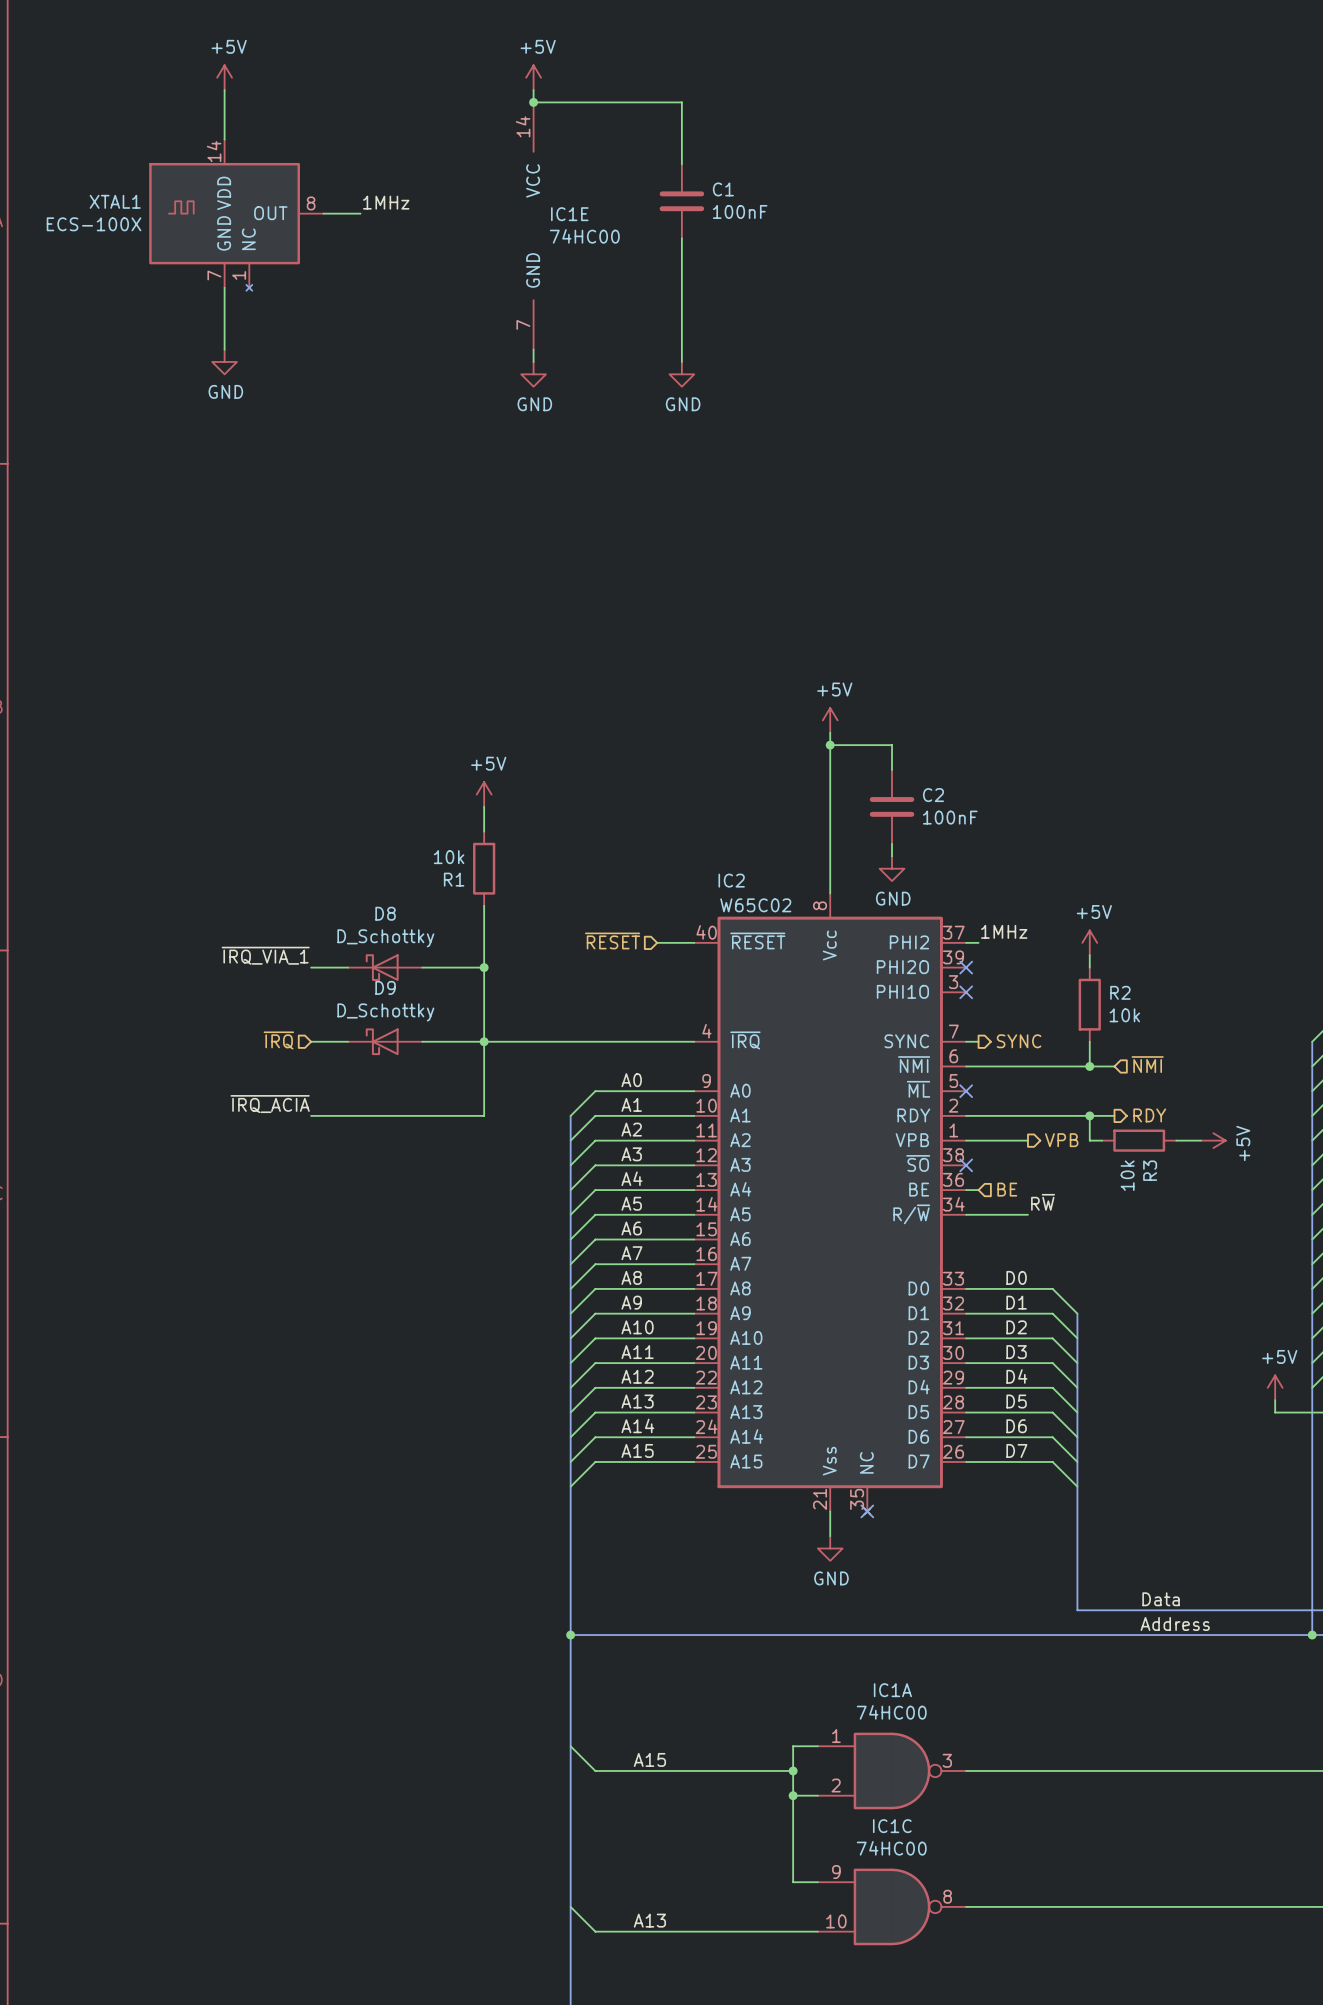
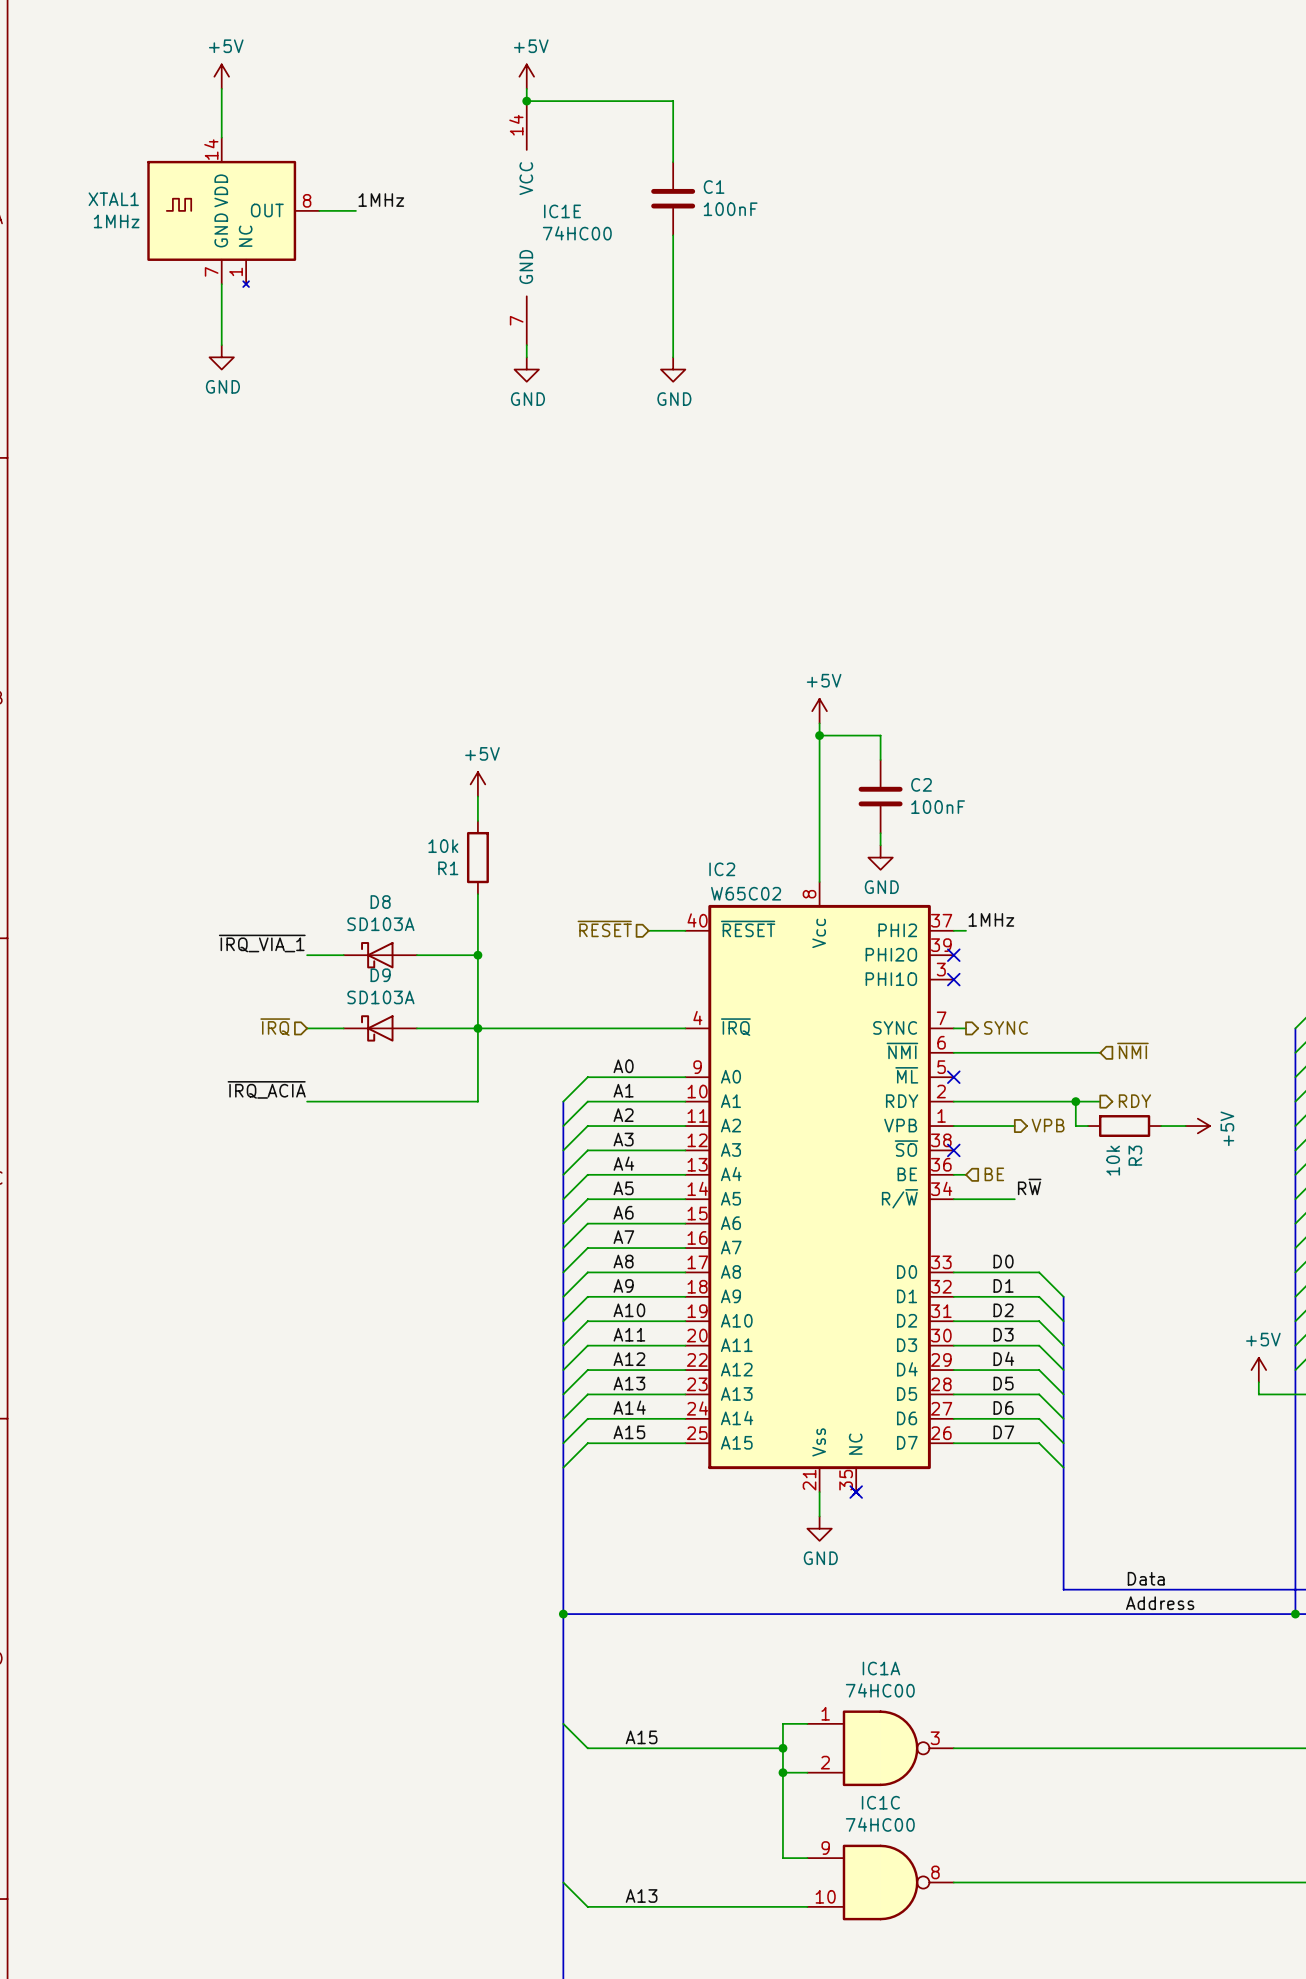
XTAL1 value: ECS-100X (94, 224) -> 1MHz (116, 221)
D8 value: D_Schottky (385, 938) -> SD103A (380, 924)
power symbol: +5V (1089, 942) -> none
wire: (1089, 955) (1089, 967) -> none
R2: 10k (1089, 1004) -> none
D9 value: D_Schottky (385, 1012) -> SD103A (380, 997)
wire: (1089, 1041) (1089, 1066) -> none
junction: (1089, 1066) -> none

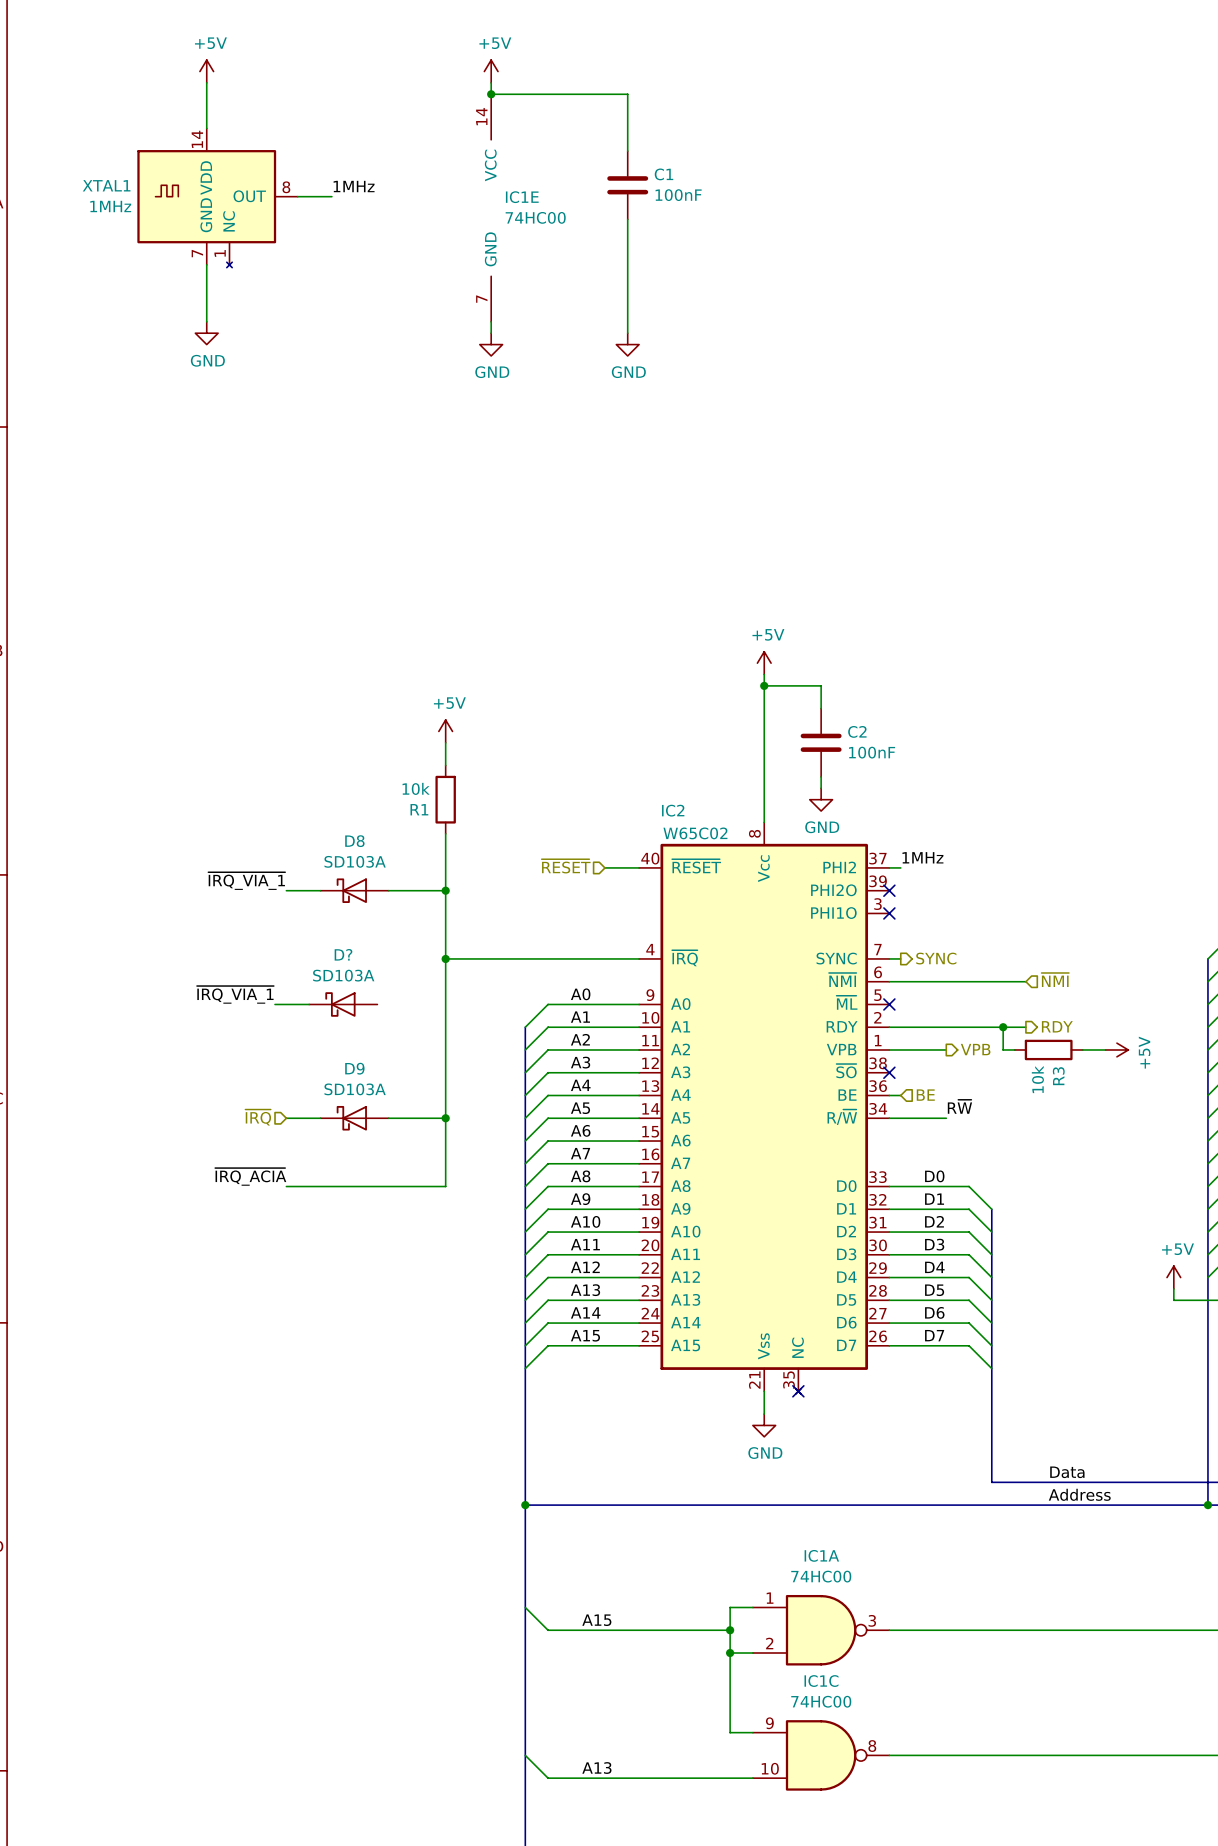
hierarchical label position: ~{IRQ} (275, 1027) -> ~{IRQ} (258, 1117)
wire: (307, 1028) (343, 1028) -> (275, 1004) (309, 1004)
D9 position: (380, 1028) -> (354, 1118)
wire: (416, 1028) (477, 1028) -> (388, 1118) (445, 1118)
label: none -> ~{IRQ_VIA_1} (235, 994)
D?: none -> SD103A (343, 1004)
label position: ~{IRQ_ACIA} (266, 1089) -> ~{IRQ_ACIA} (250, 1176)
wire: (307, 1101) (477, 1101) -> (286, 1186) (445, 1186) (445, 1027)
wire: none -> (286, 1118) (320, 1118)
junction: none -> (445, 1118)

